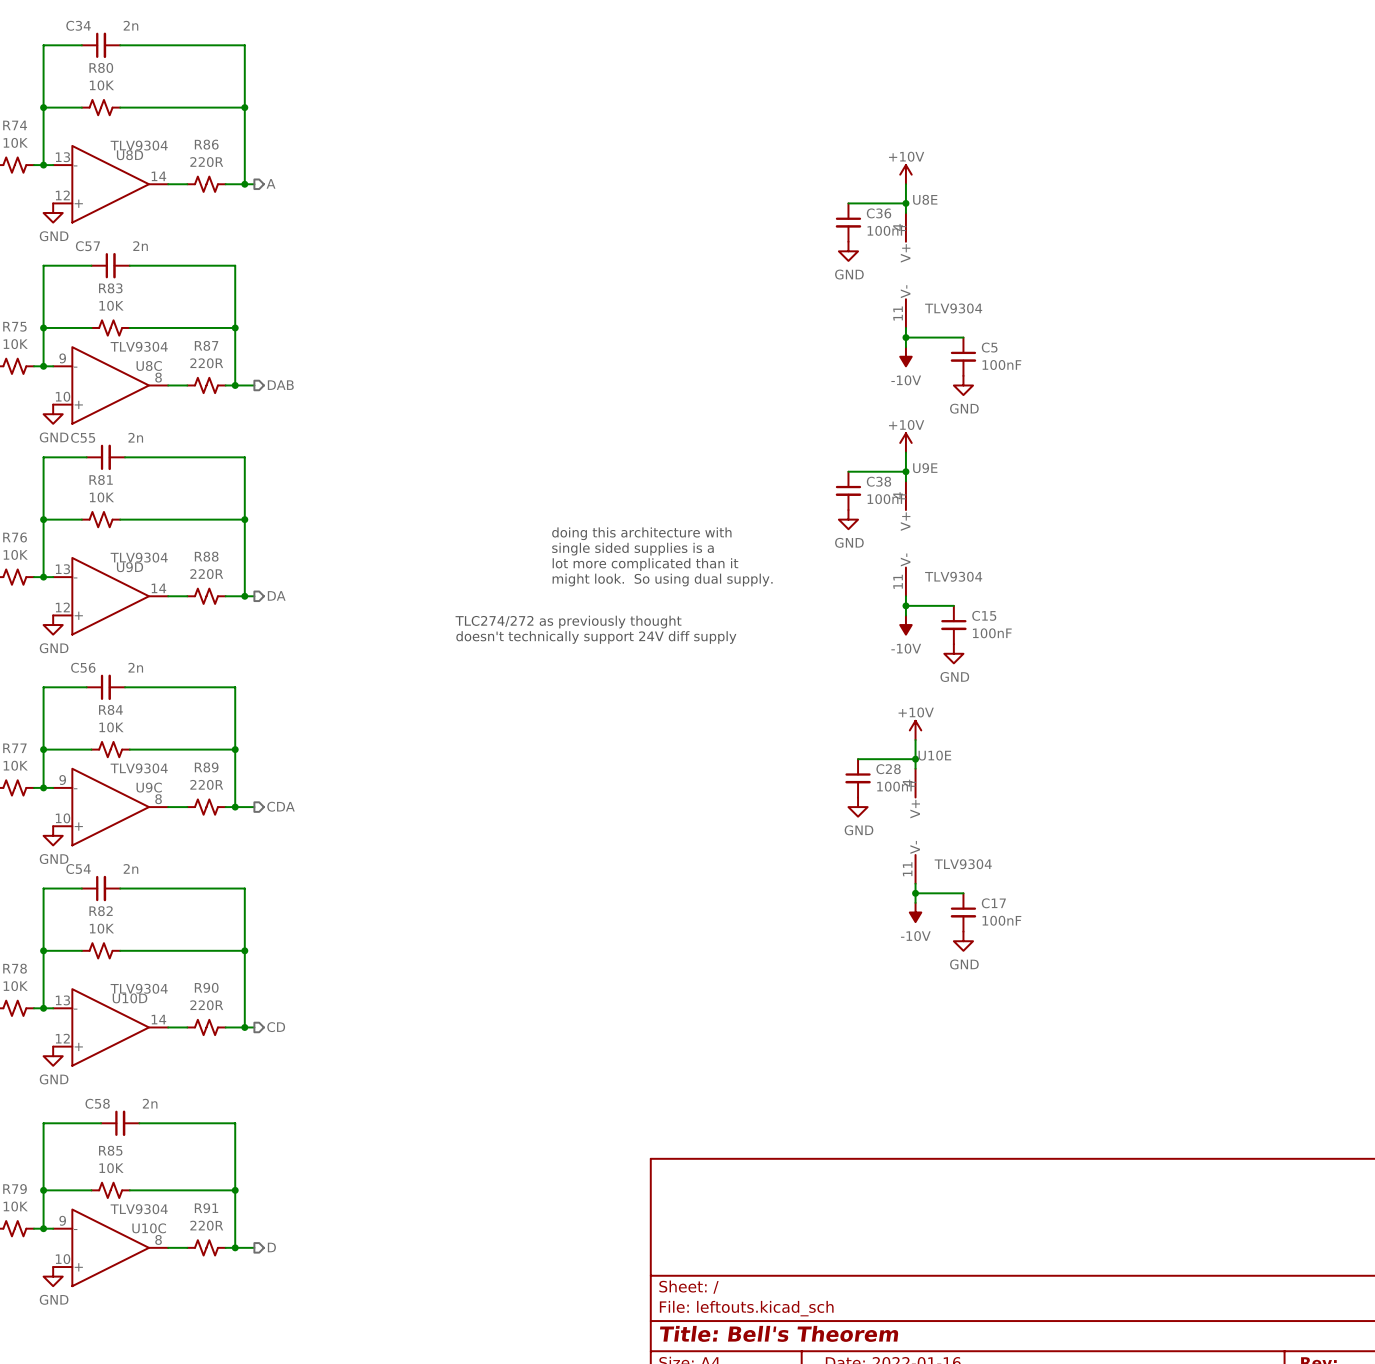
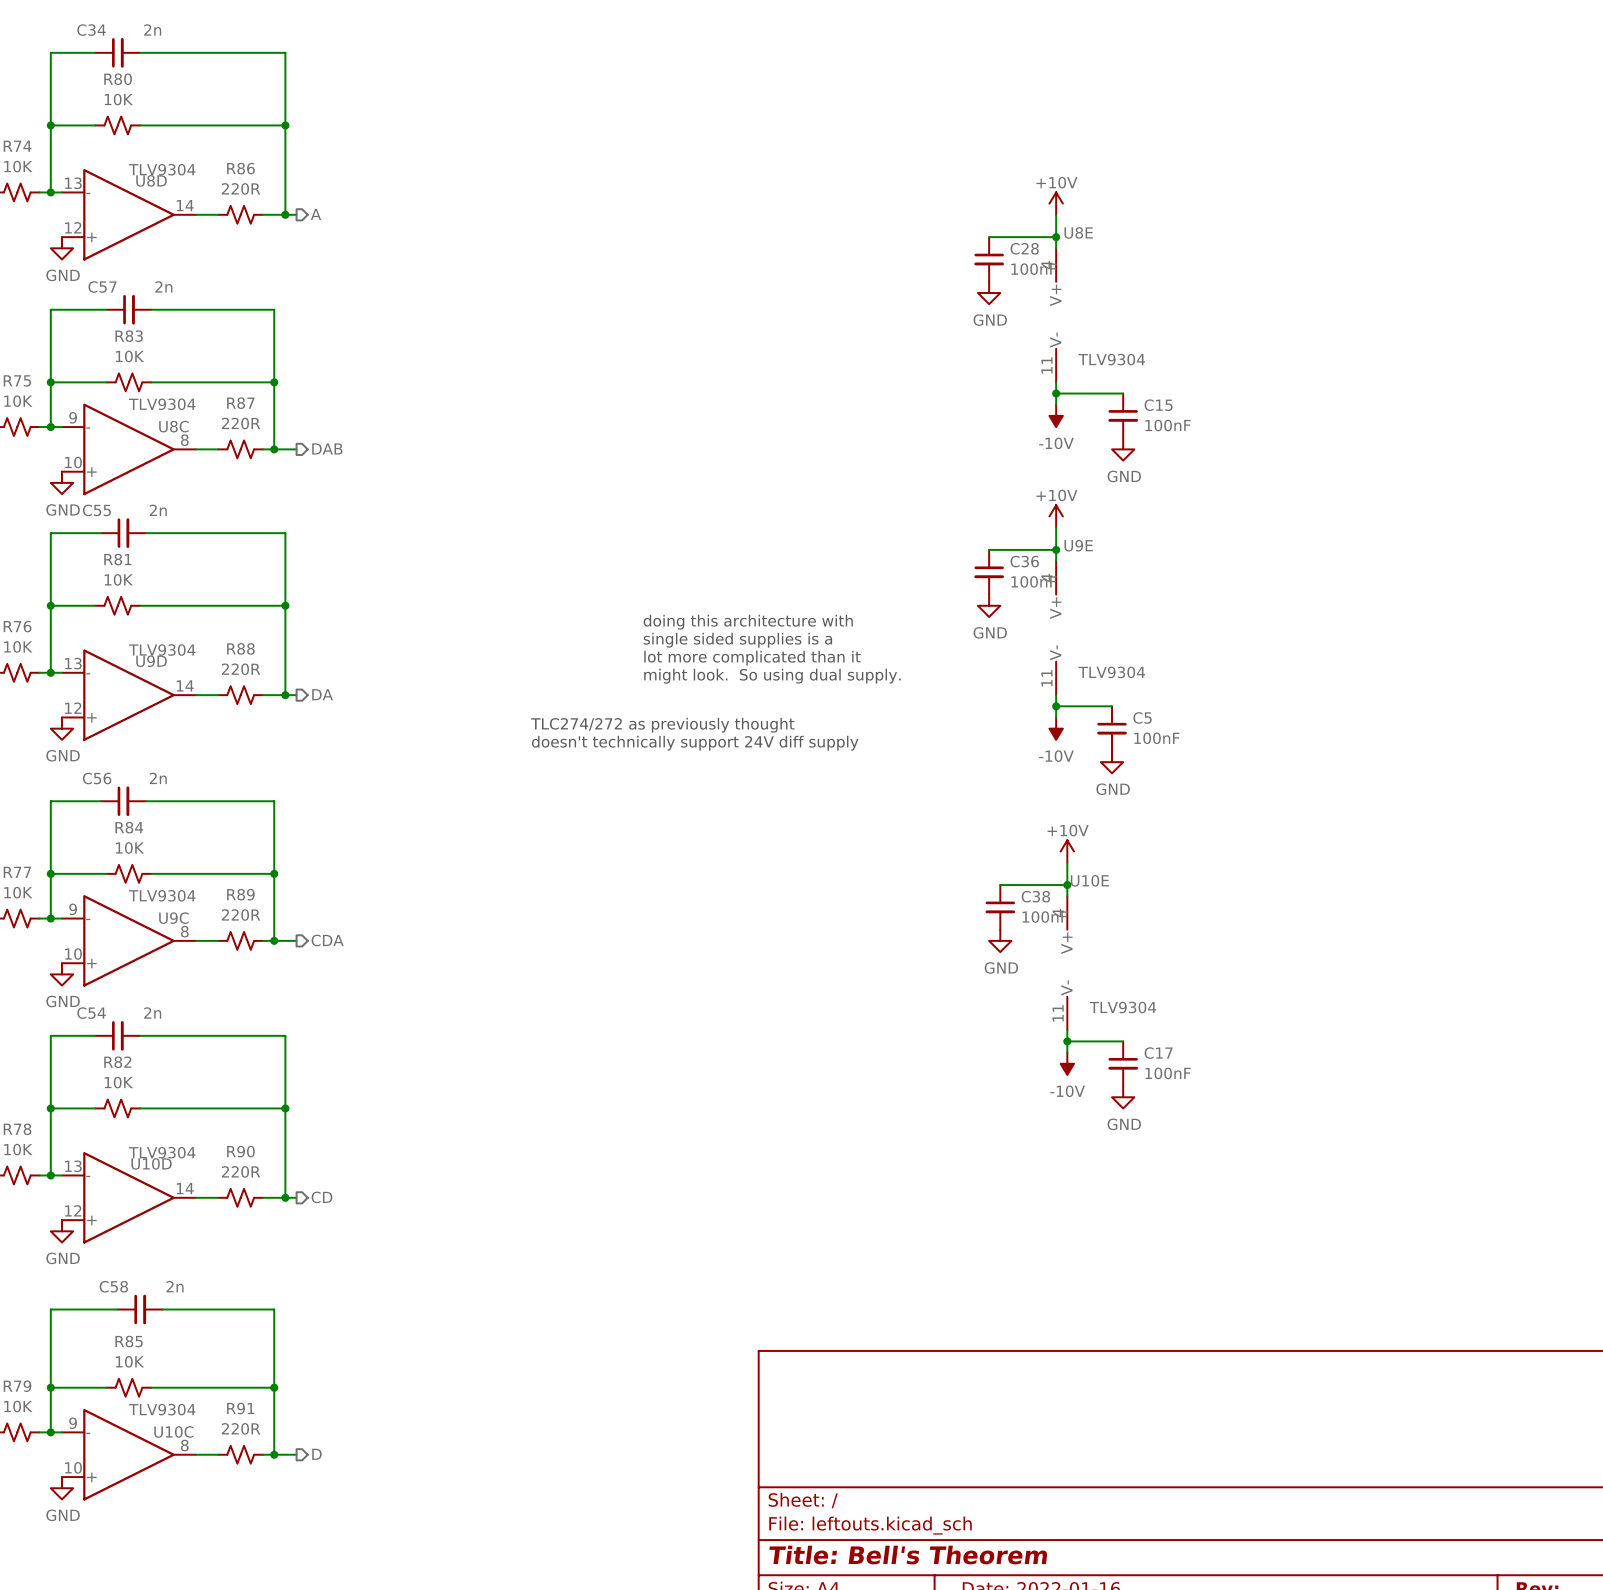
C36 name: C36 (879, 213) -> C28 (1024, 248)
C5 name: C5 (989, 347) -> C15 (1158, 405)
C38 name: C38 (878, 481) -> C36 (1024, 561)
C15 name: C15 (984, 615) -> C5 (1142, 717)
C28 name: C28 (888, 769) -> C38 (1035, 896)

